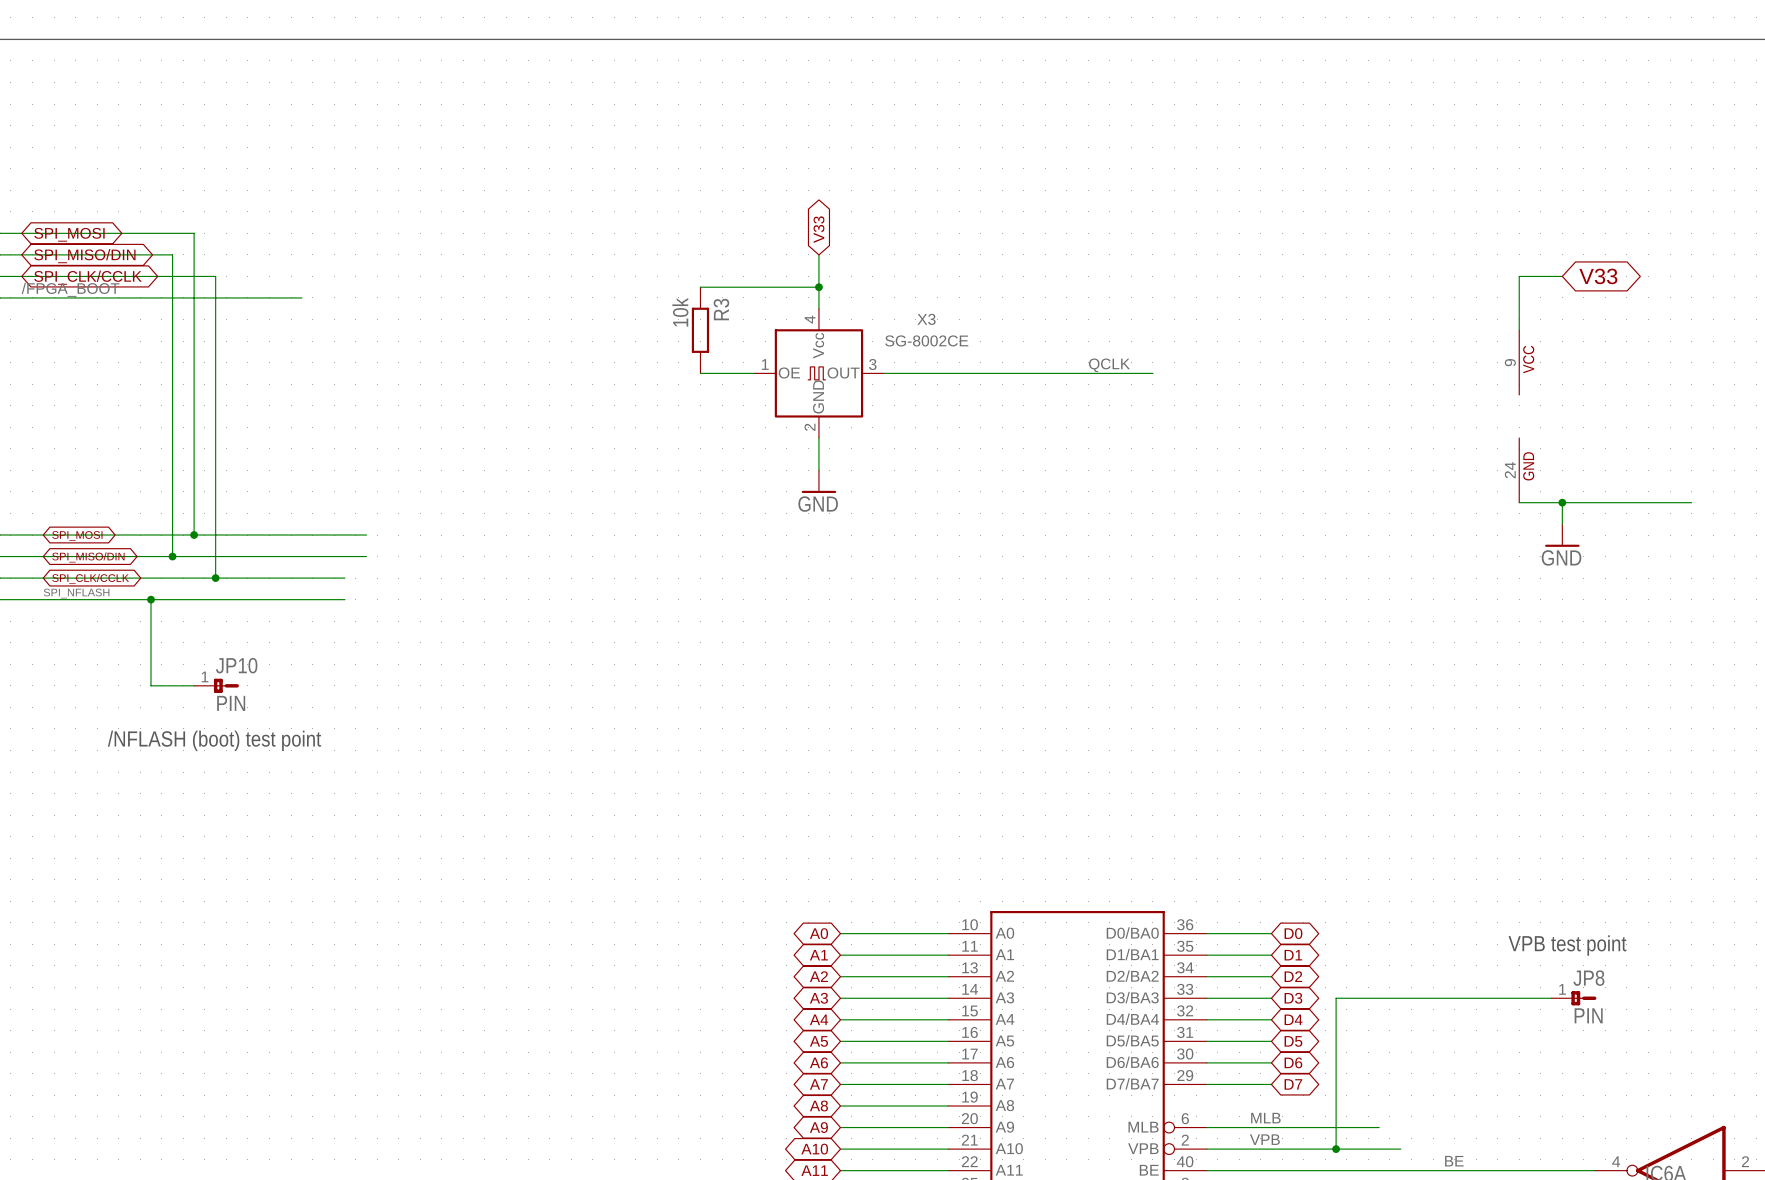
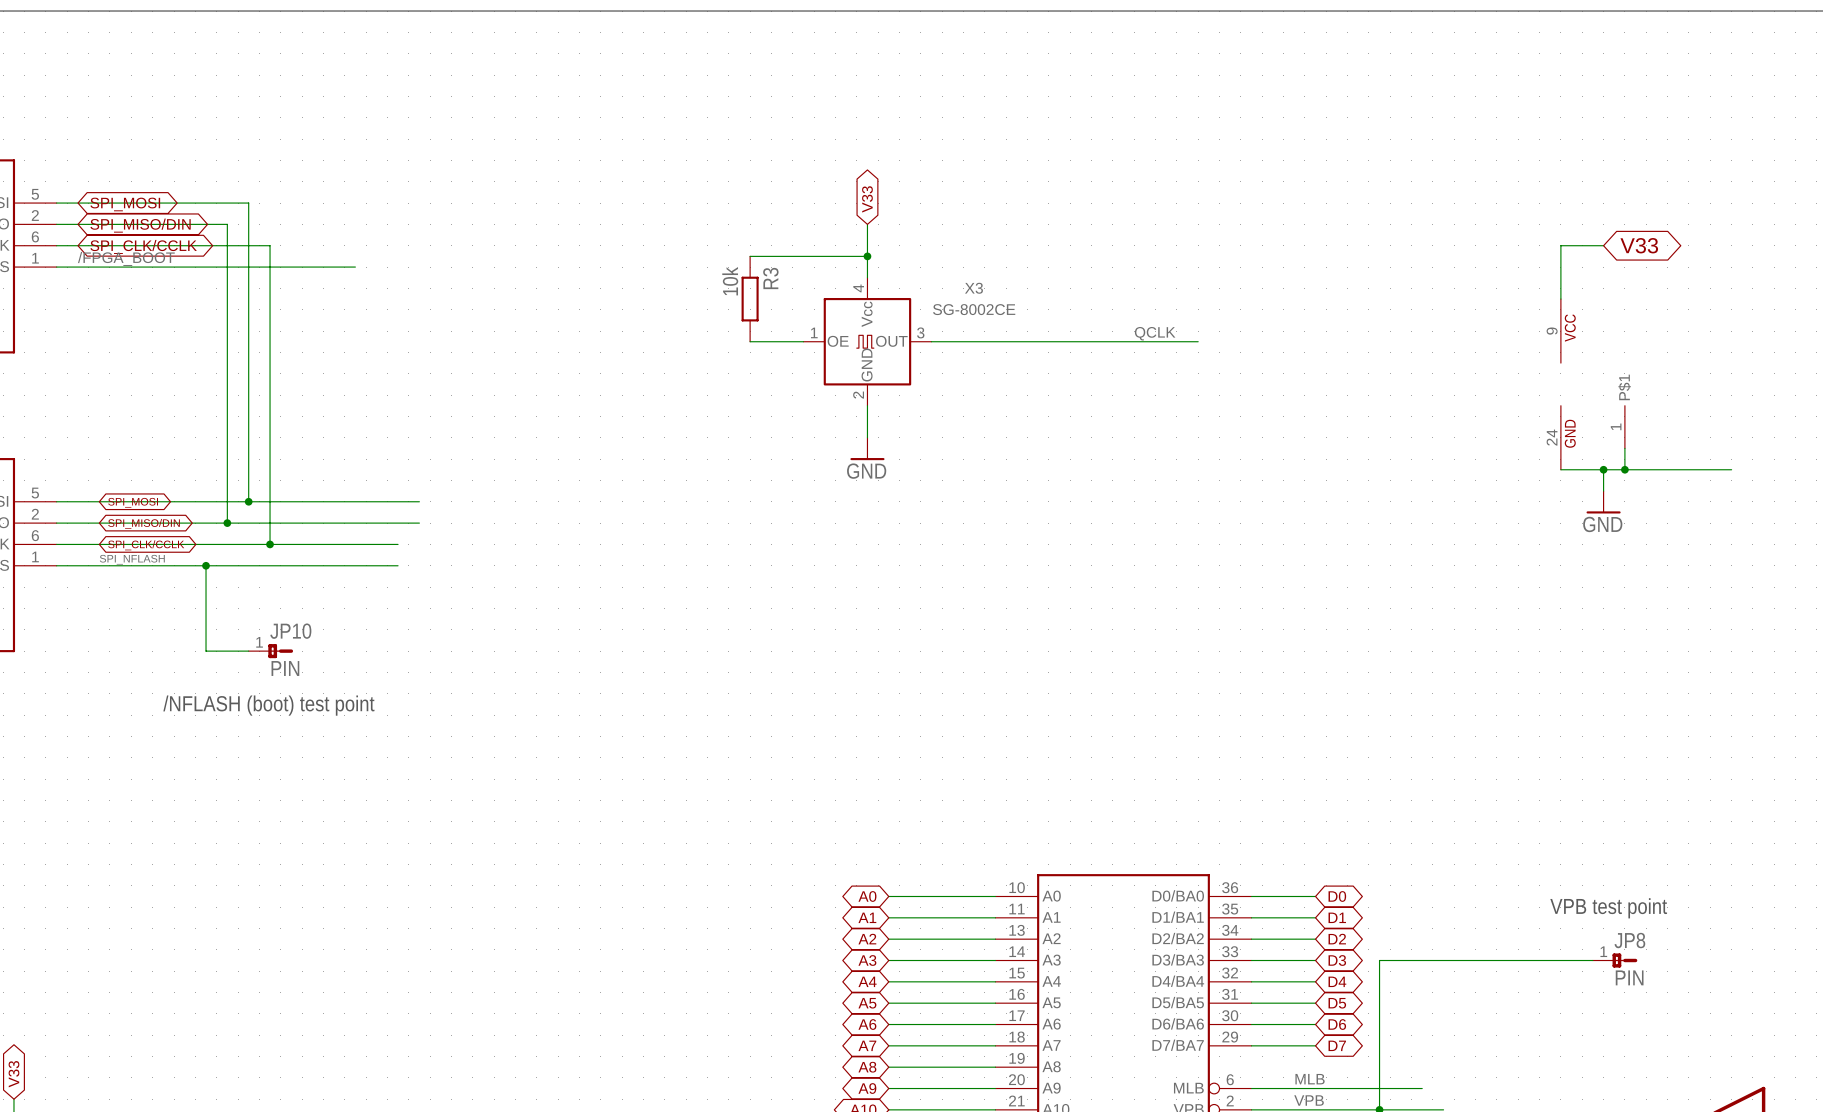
part: none -> (1624, 427)
wire: none -> (1624, 448) (1624, 469)
junction: none -> (1624, 469)

